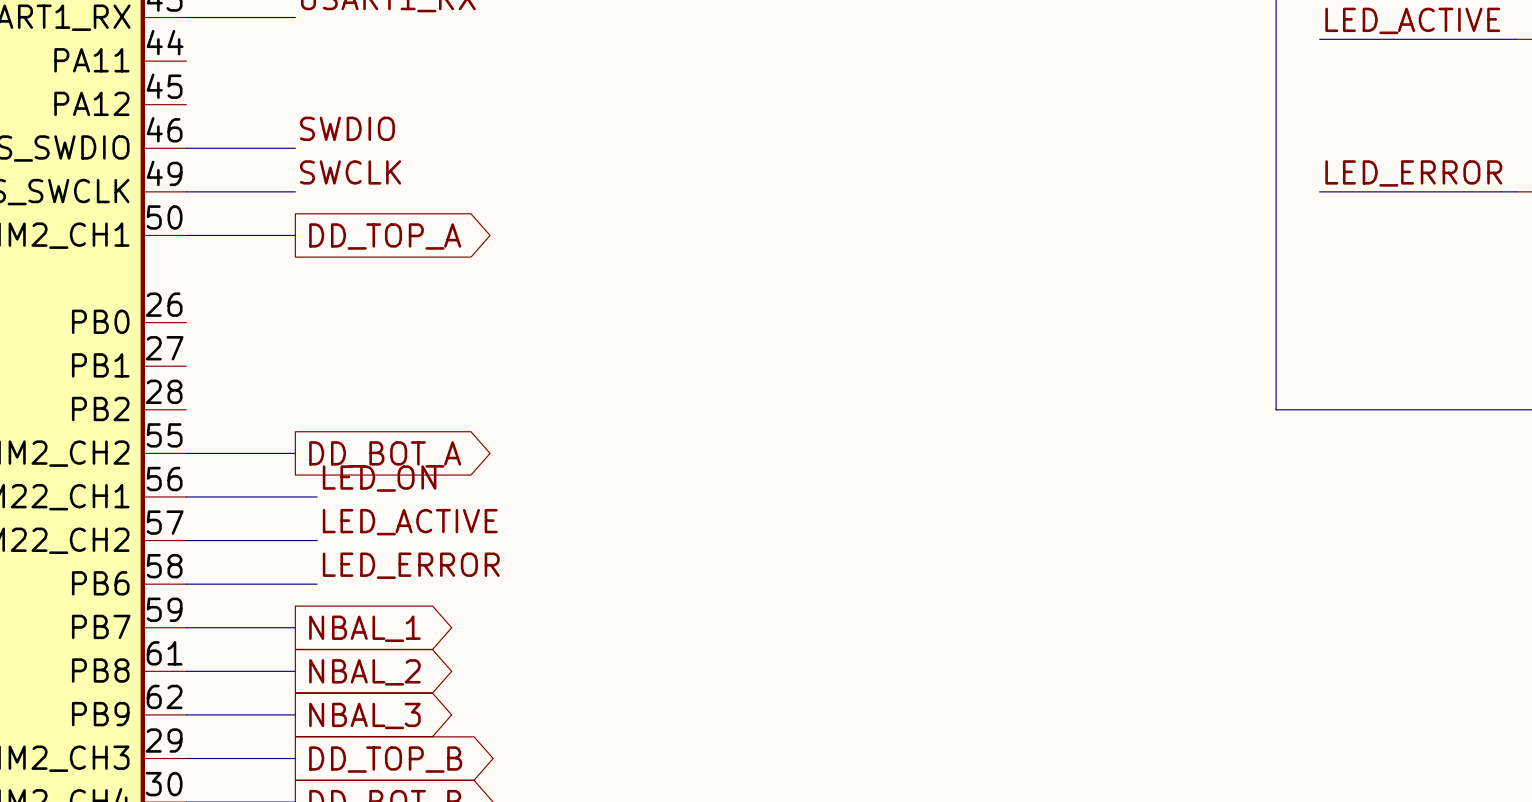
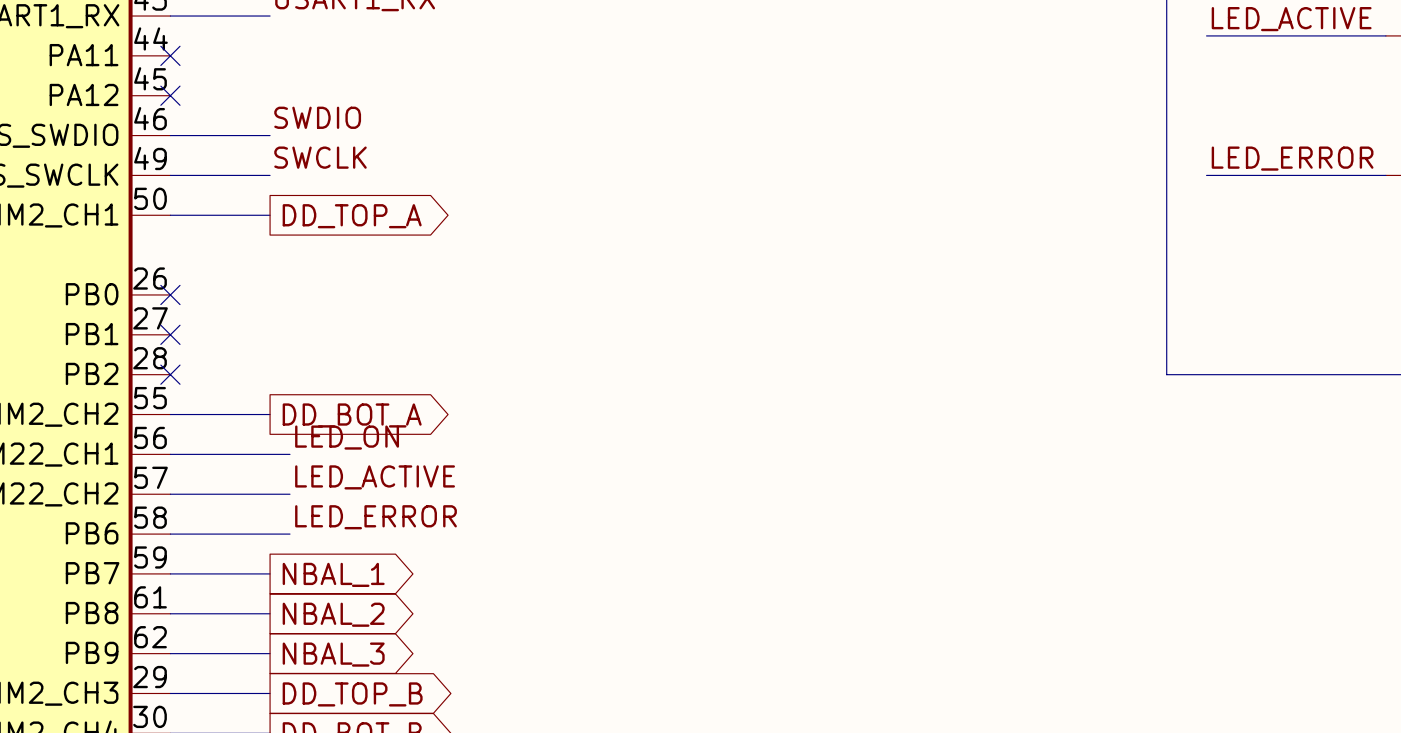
no-connect mark: none -> (170, 55)
no-connect mark: none -> (170, 95)
no-connect mark: none -> (170, 294)
no-connect mark: none -> (170, 334)
no-connect mark: none -> (170, 374)

